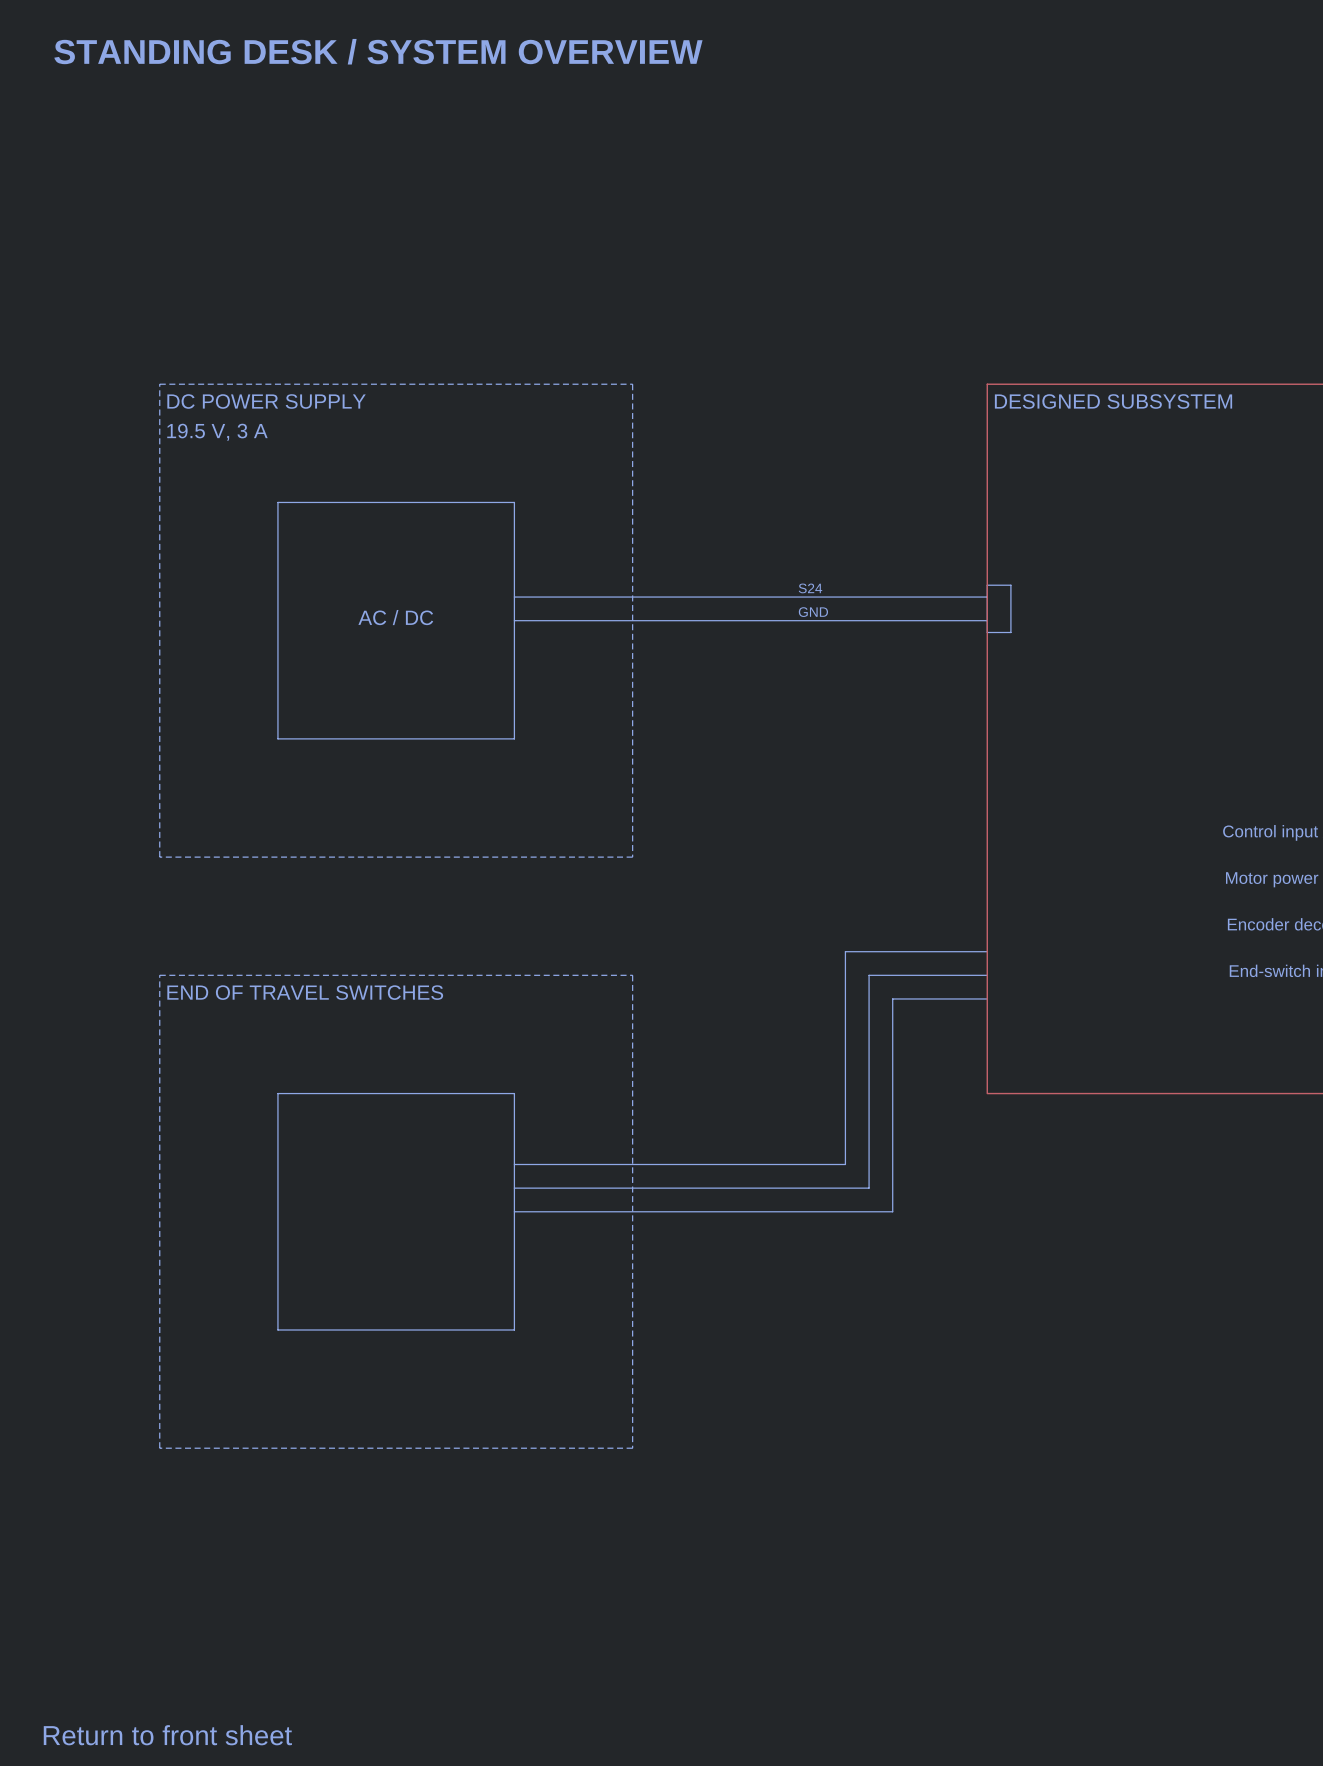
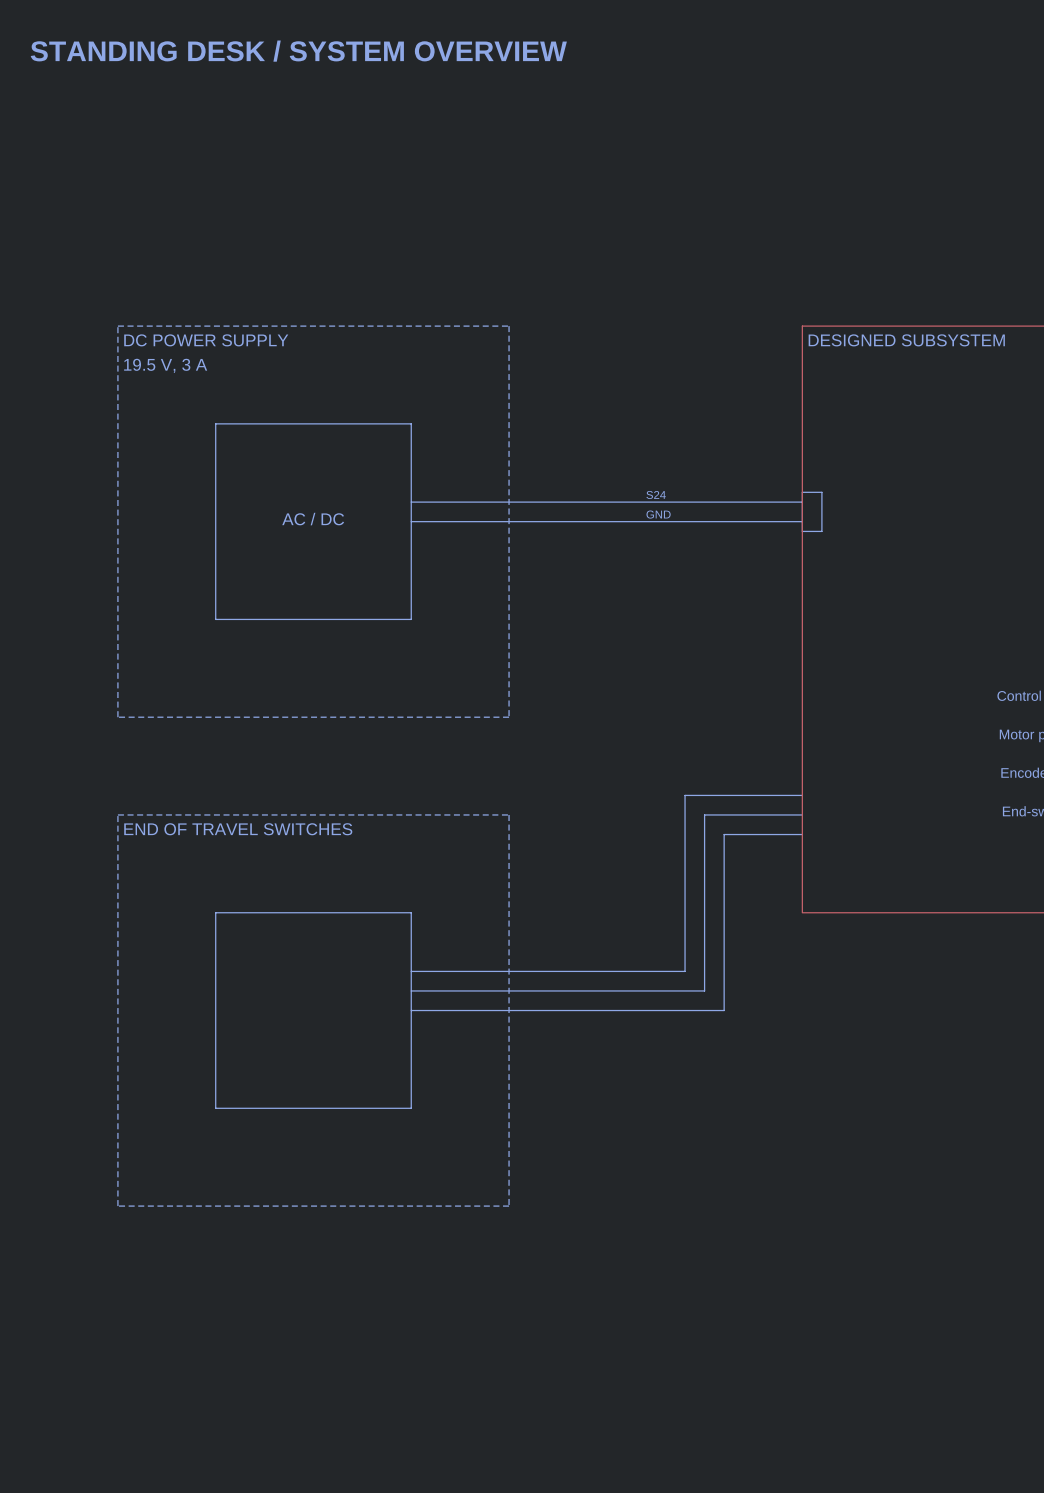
text: Return to front sheet (167, 1735) -> none

